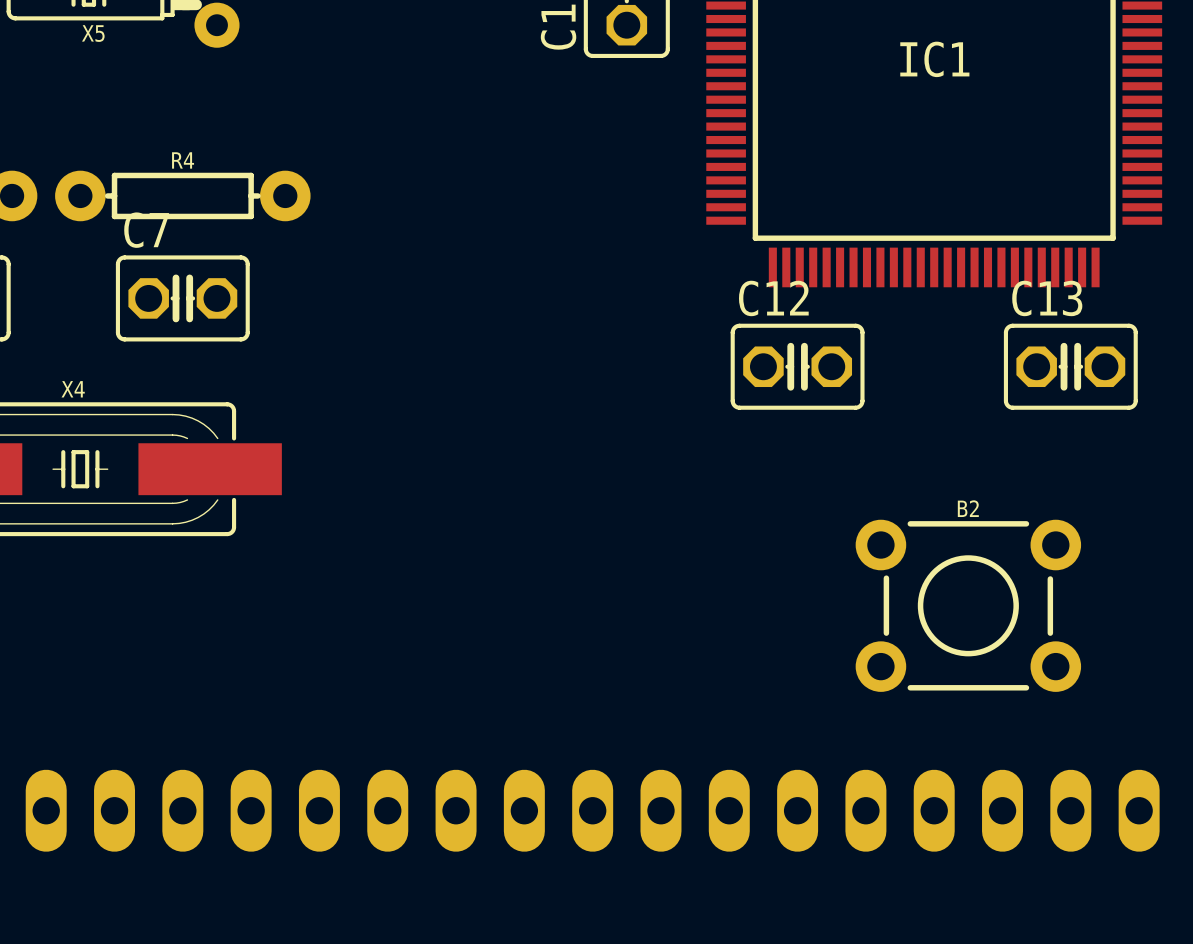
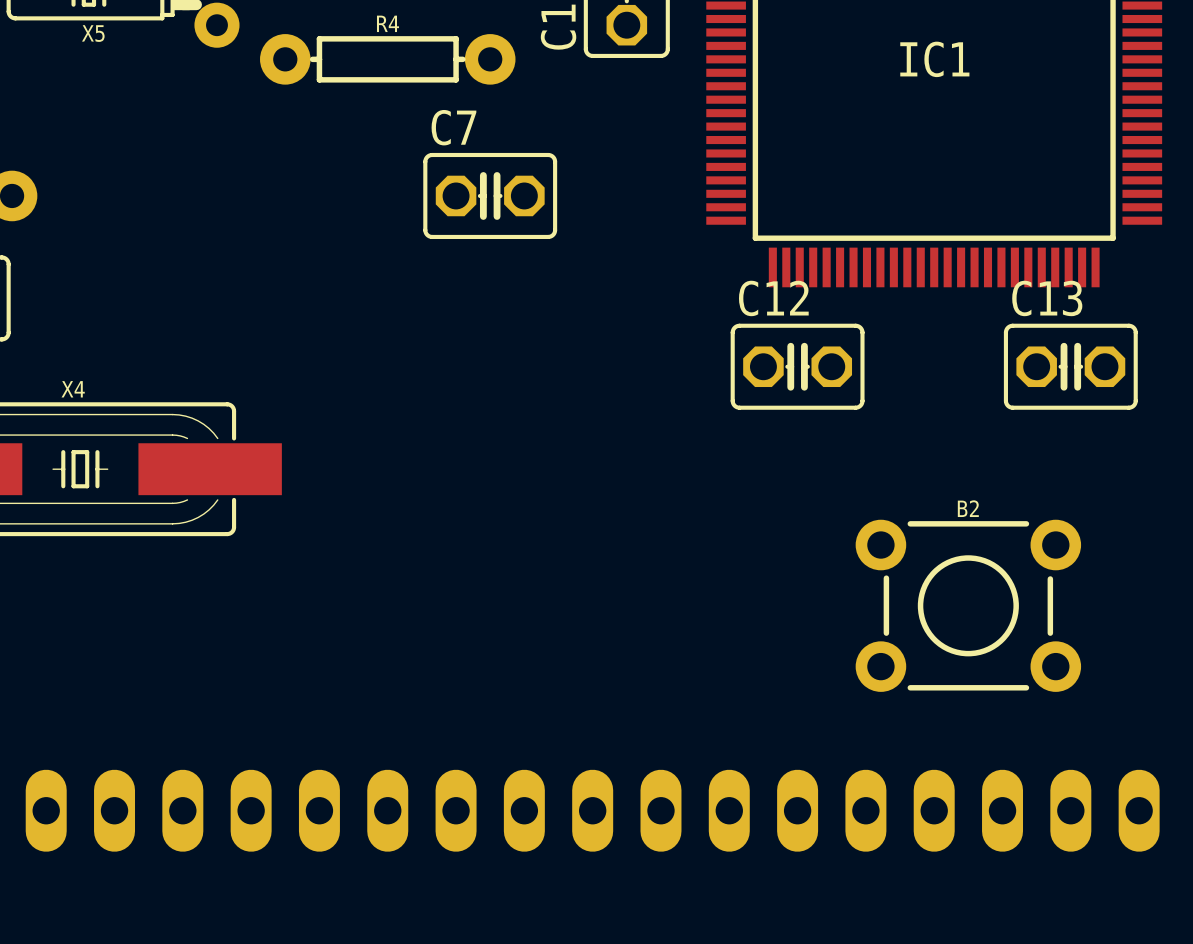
R4 position: (182, 195) -> (387, 59)
C7 position: (182, 298) -> (490, 195)

